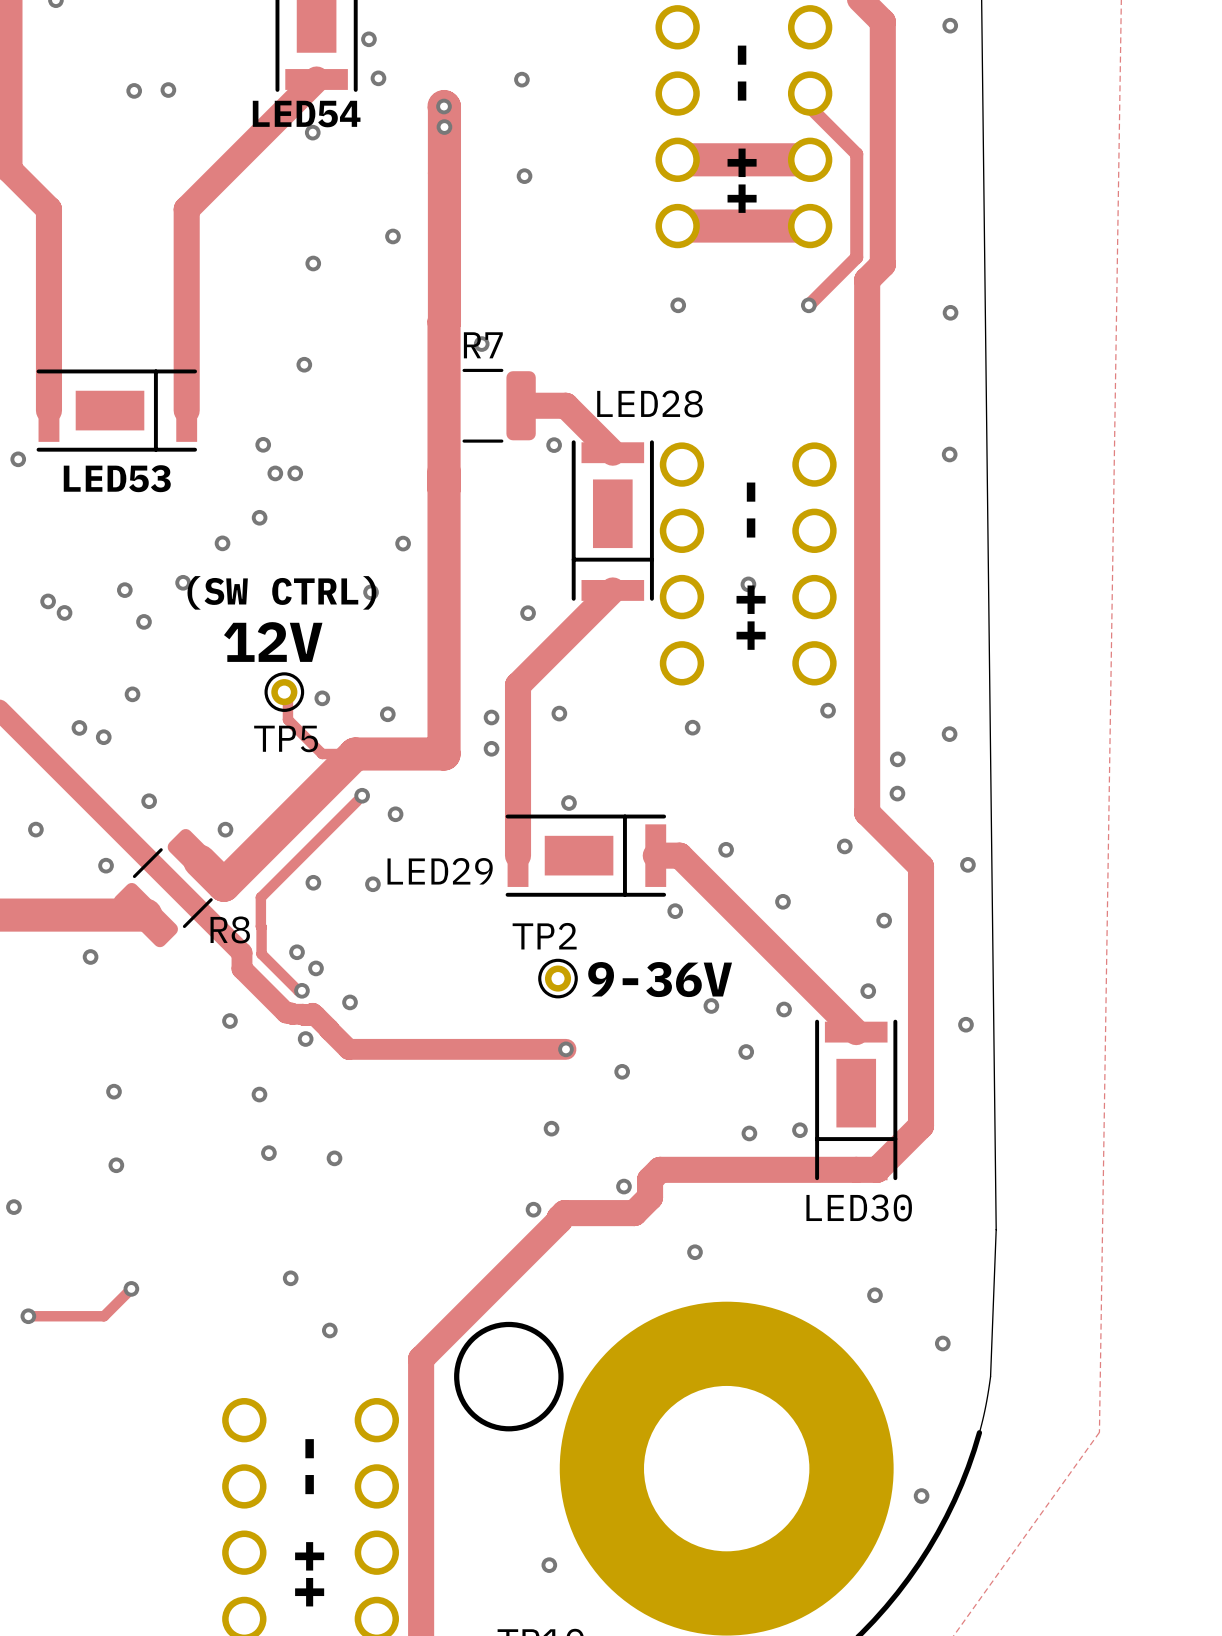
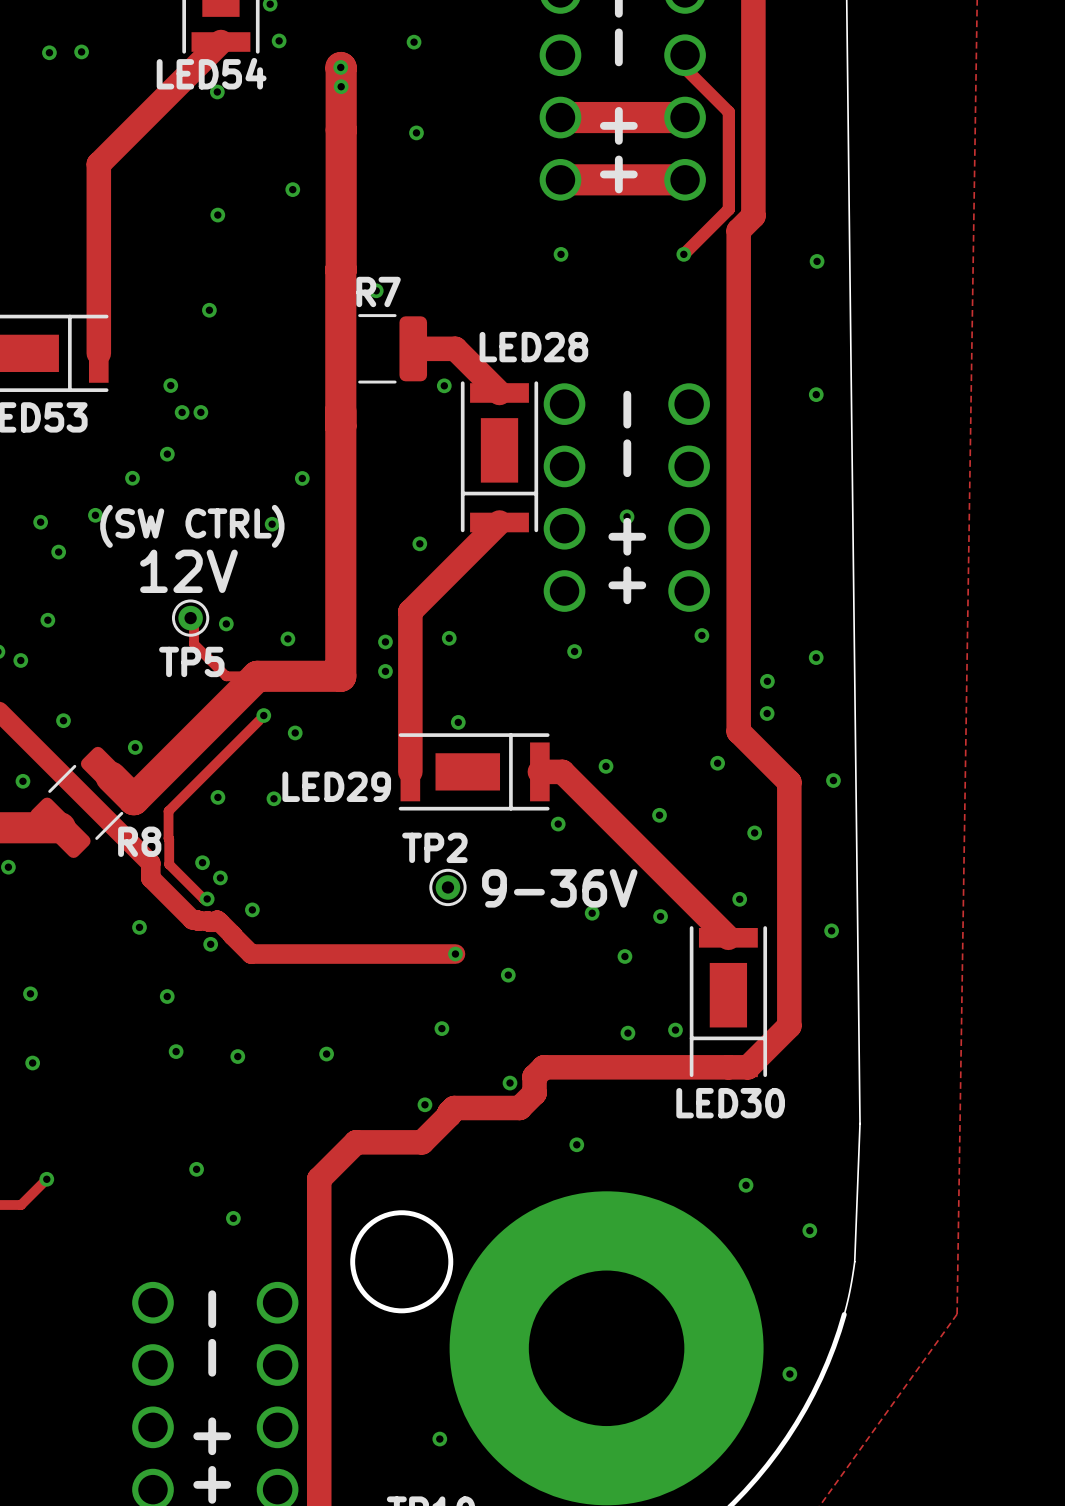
via: none -> (326, 1054)
track: (530, 1249) (421, 1359) -> (422, 1142) (356, 1142) (319, 1179) (319, 1245)

